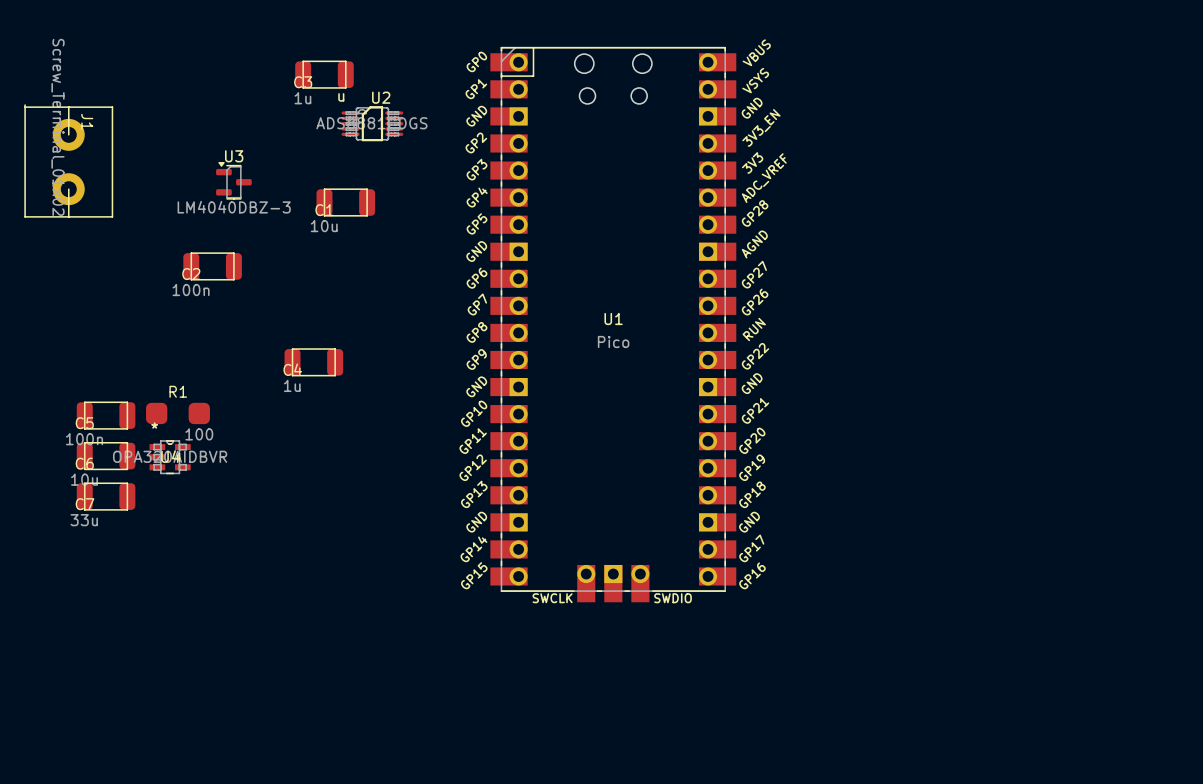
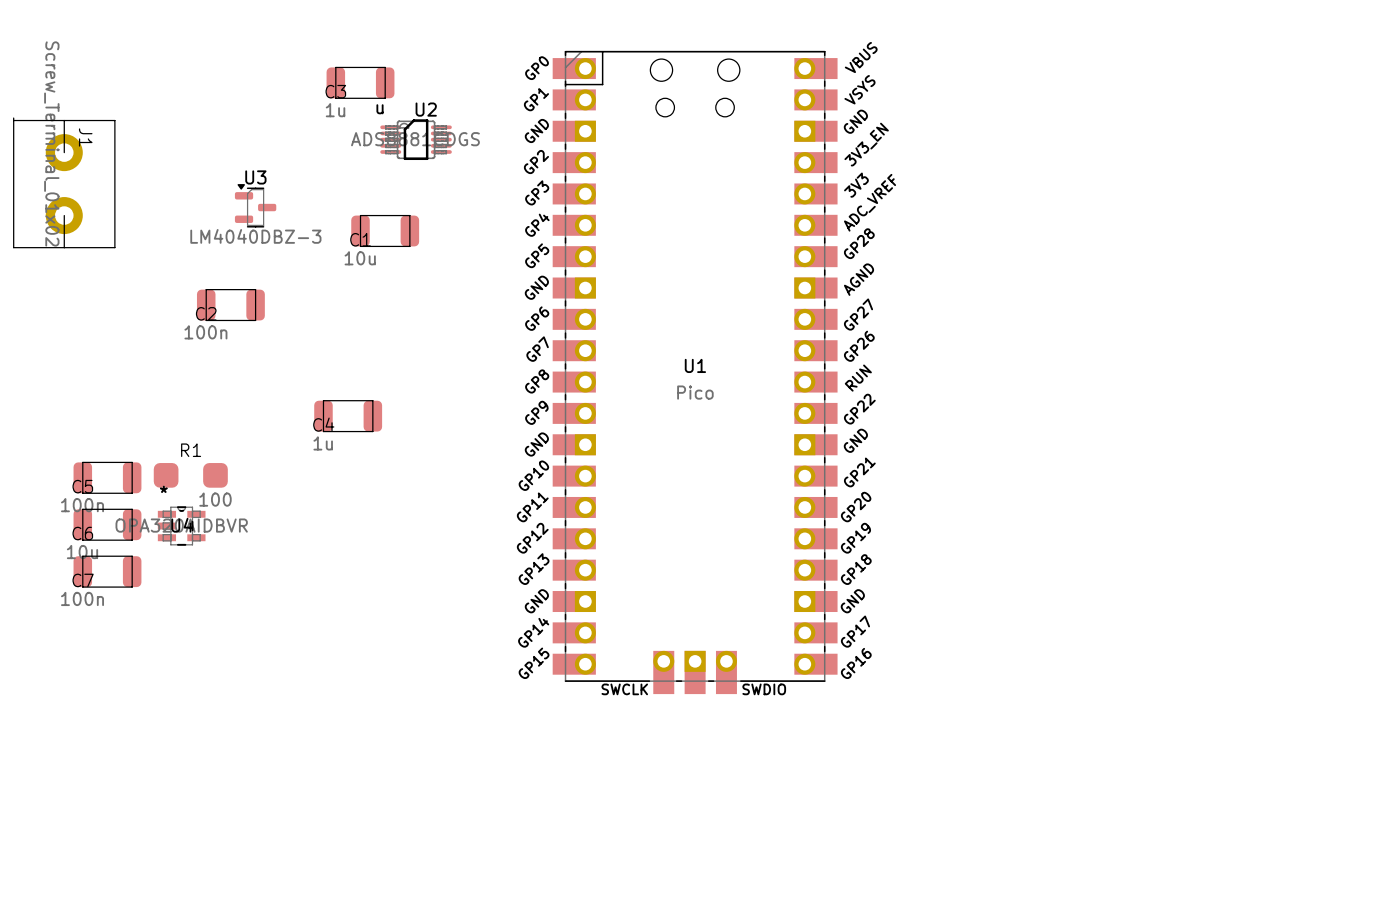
C7 value: 33u (84, 520) -> 100n (82, 598)

